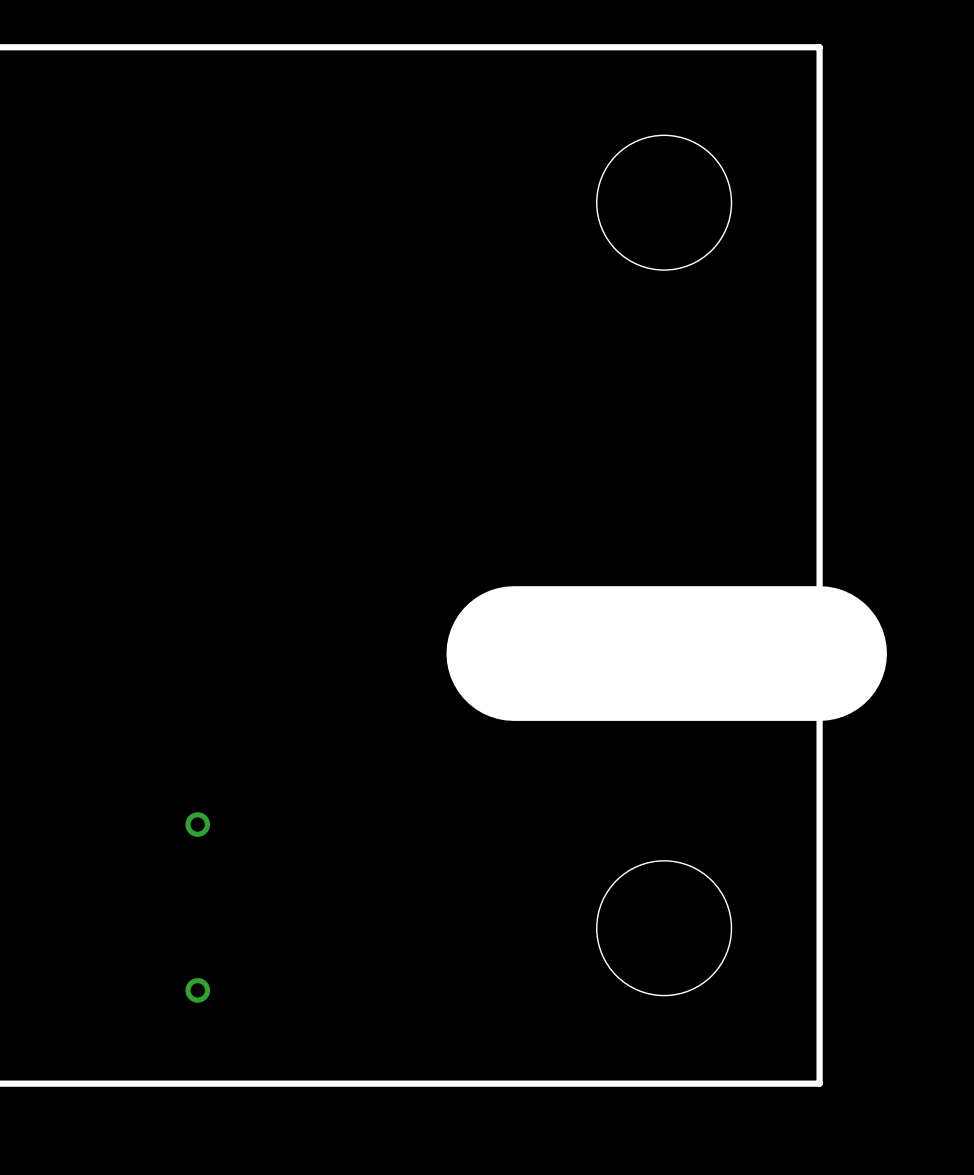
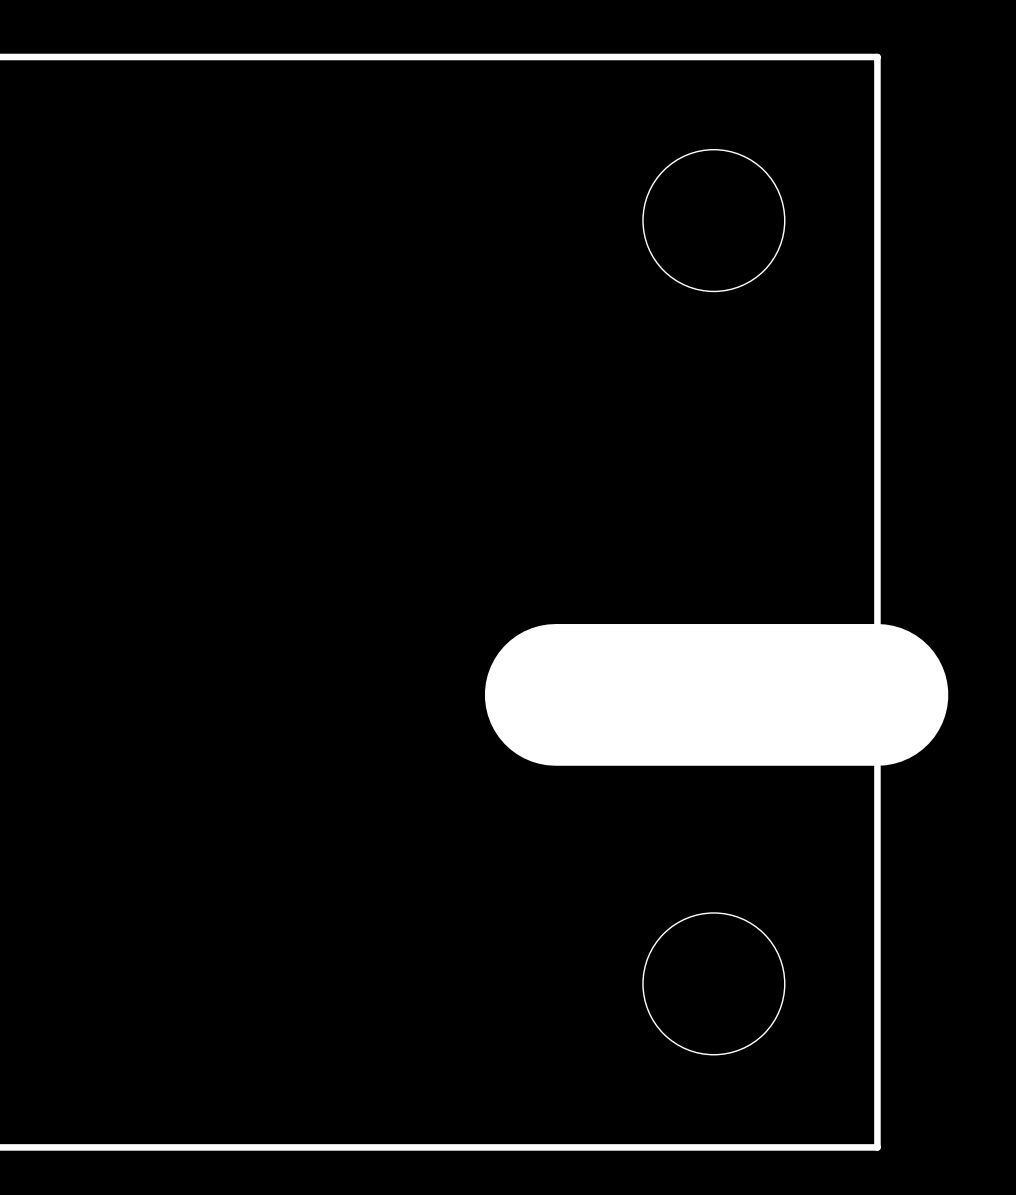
via: (197, 824) -> none
via: (197, 990) -> none

